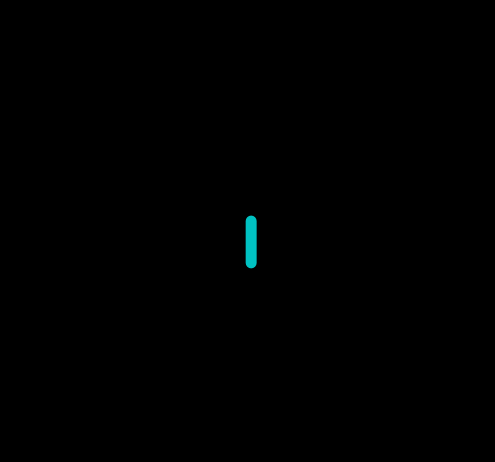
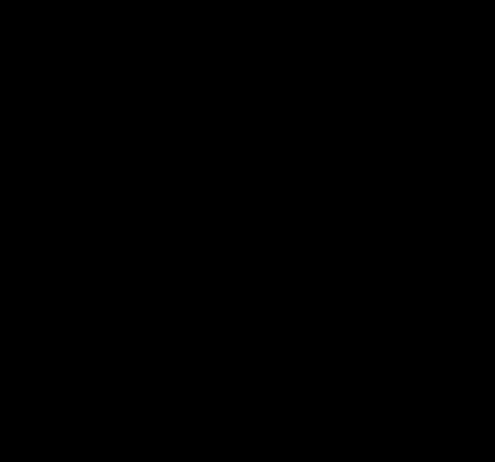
text: - (251, 241) -> none

